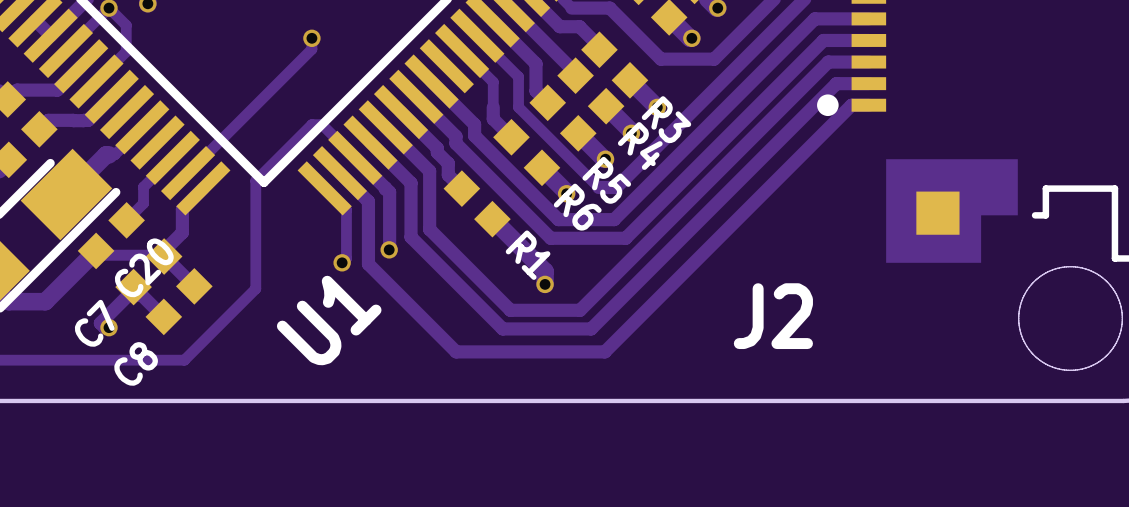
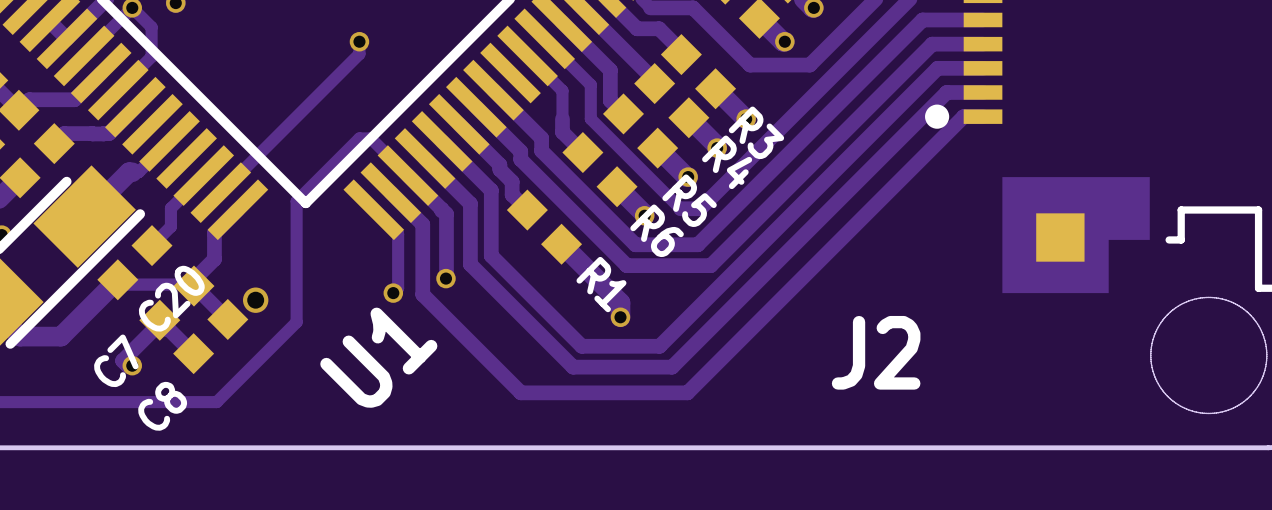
via: none -> (255, 300)

